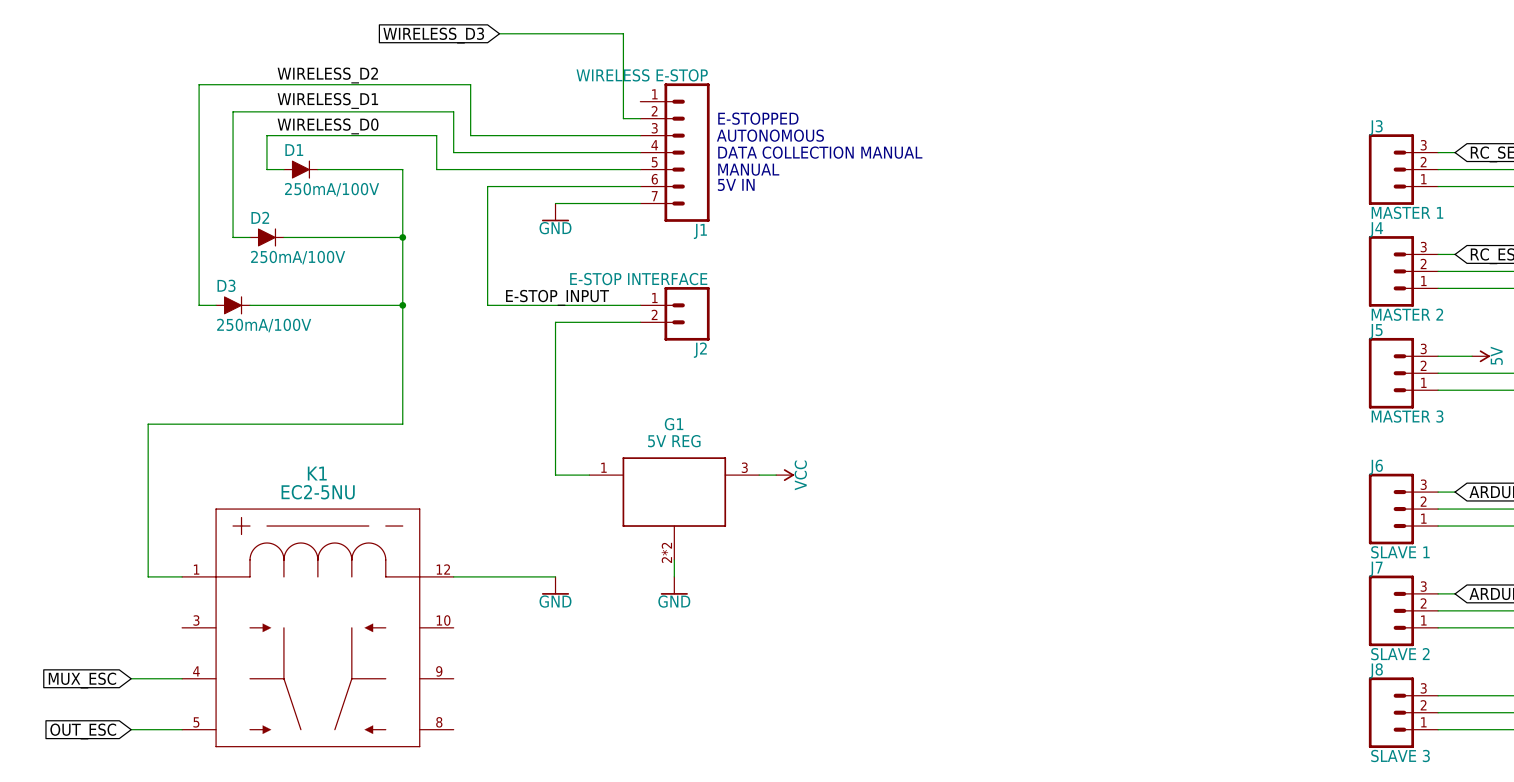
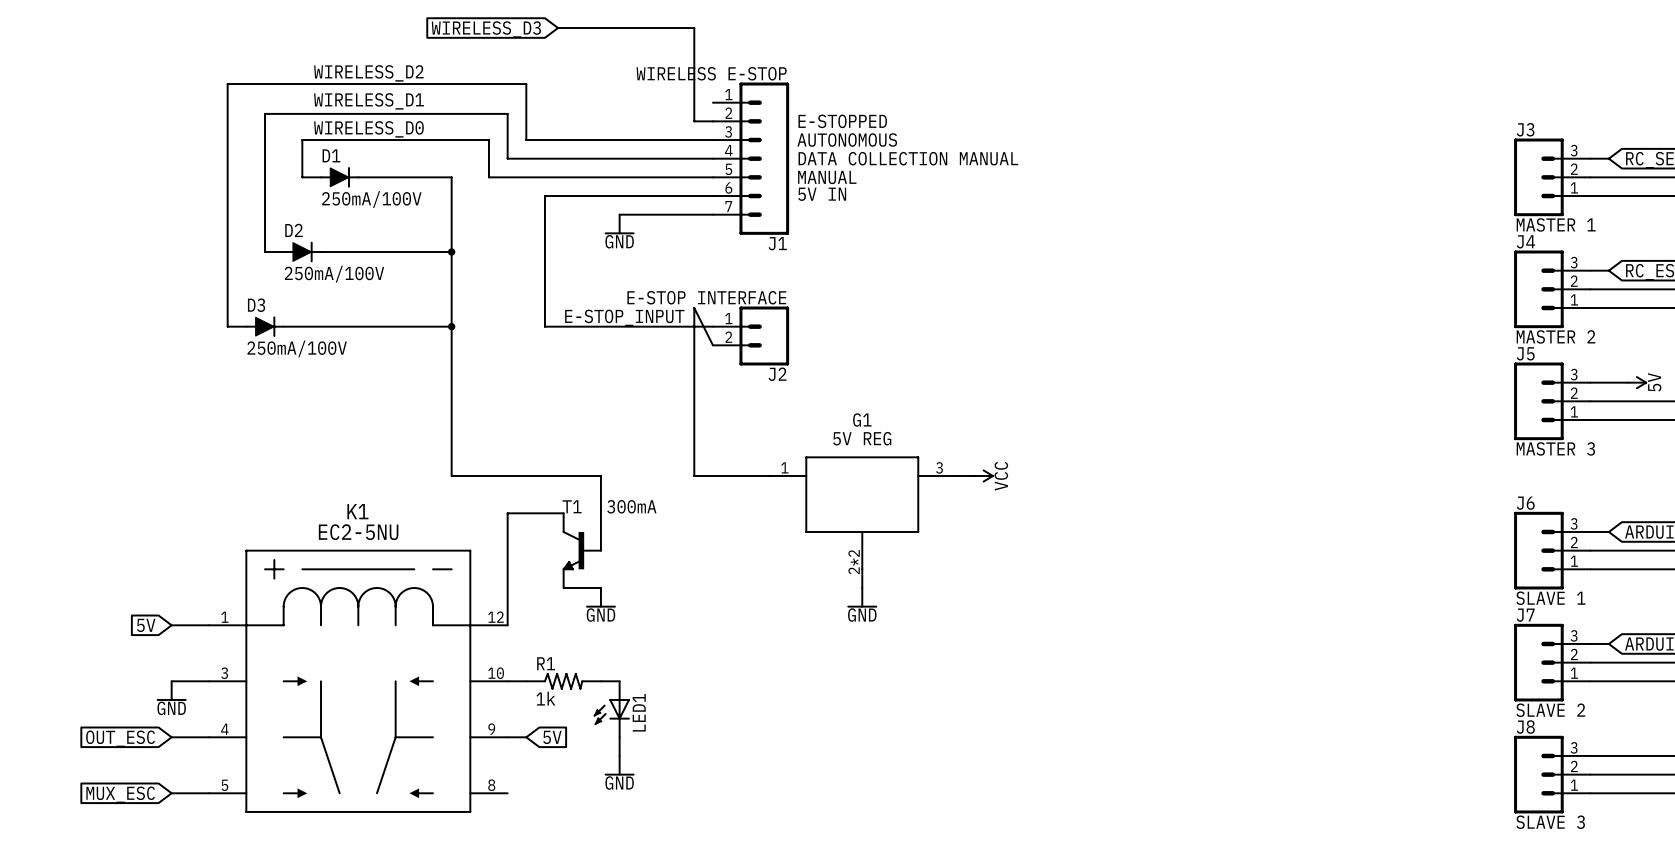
wire: (640, 322) (555, 322) (555, 475) (589, 475) -> (712, 345) (694, 308) (694, 475) (768, 475)
wire: (402, 424) (148, 424) (148, 576) -> (451, 457) (451, 475) (600, 475) (600, 550)
wire: (759, 475) (776, 475) -> (955, 475) (974, 475)
power symbol position: VCC (785, 475) -> VCC (984, 475)
G1 position: (674, 508) -> (862, 512)
T1: none -> 300mA (582, 550)
wire: none -> (563, 587) (600, 587)
power symbol: none -> GND (862, 597)
wire: (674, 559) (674, 576) -> (862, 569) (862, 587)
wire: (453, 576) (555, 576) -> (507, 625) (507, 513) (563, 513)
global label: none -> 5V (146, 625)
power symbol position: GND (555, 585) -> GND (600, 597)
power symbol: GND (674, 585) -> none
wire: none -> (171, 681) (209, 681)
wire: none -> (507, 681) (526, 681)
R1: none -> 1k (563, 681)
wire: none -> (600, 681) (619, 681)
power symbol: none -> GND (171, 691)
LED1: none -> (611, 709)
wire: (131, 678) (148, 678) -> none
wire: none -> (507, 737) (526, 737)
global label: none -> 5V (552, 737)
wire: none -> (619, 737) (619, 755)
global label position: MUX_ESC (82, 680) -> MUX_ESC (120, 794)
power symbol: none -> GND (619, 765)
wire: (131, 729) (148, 729) -> none
global label position: OUT_ESC (83, 731) -> OUT_ESC (120, 738)

